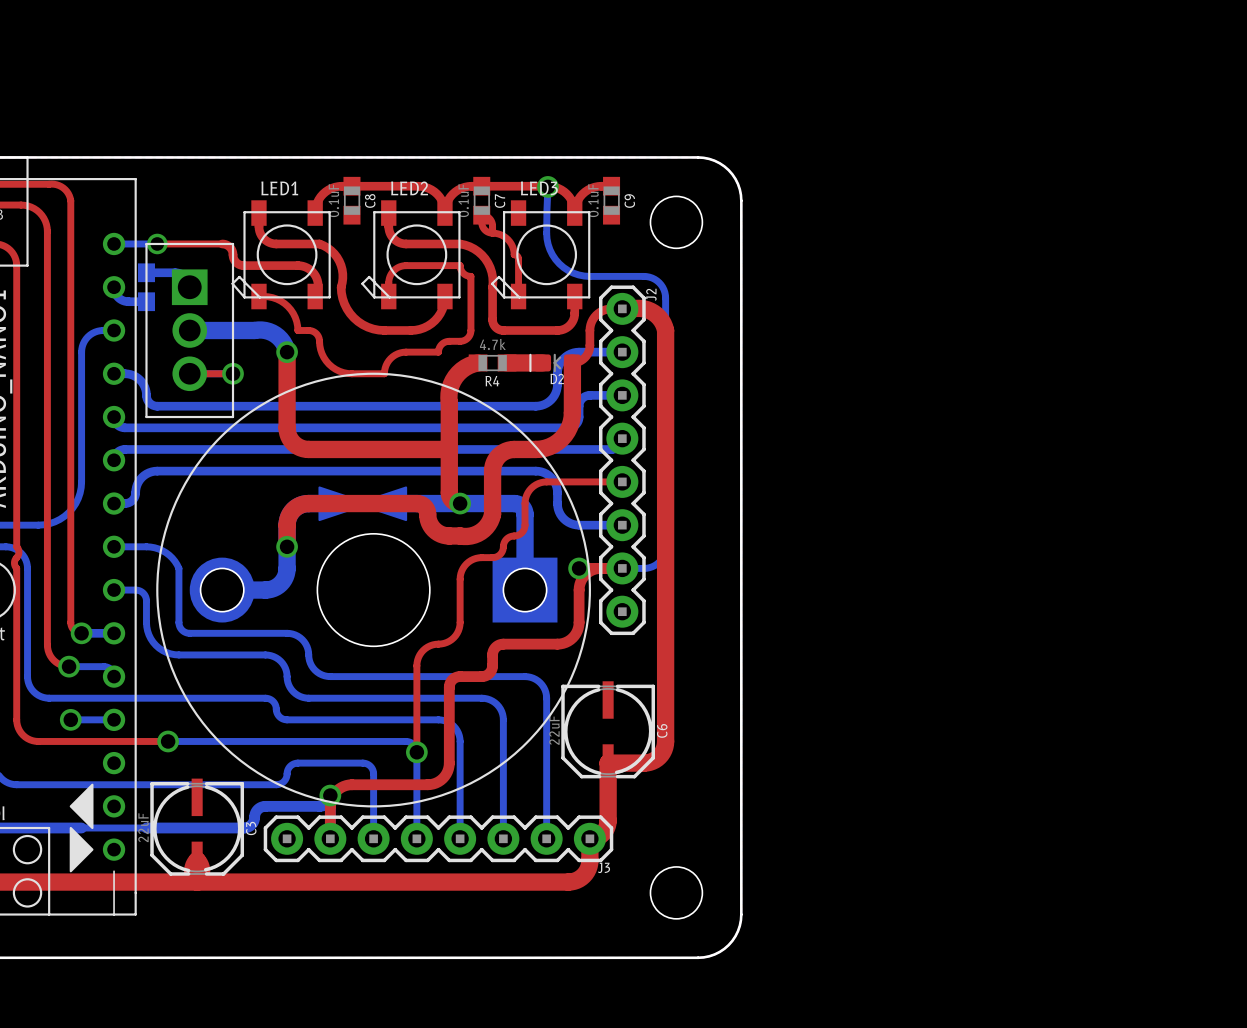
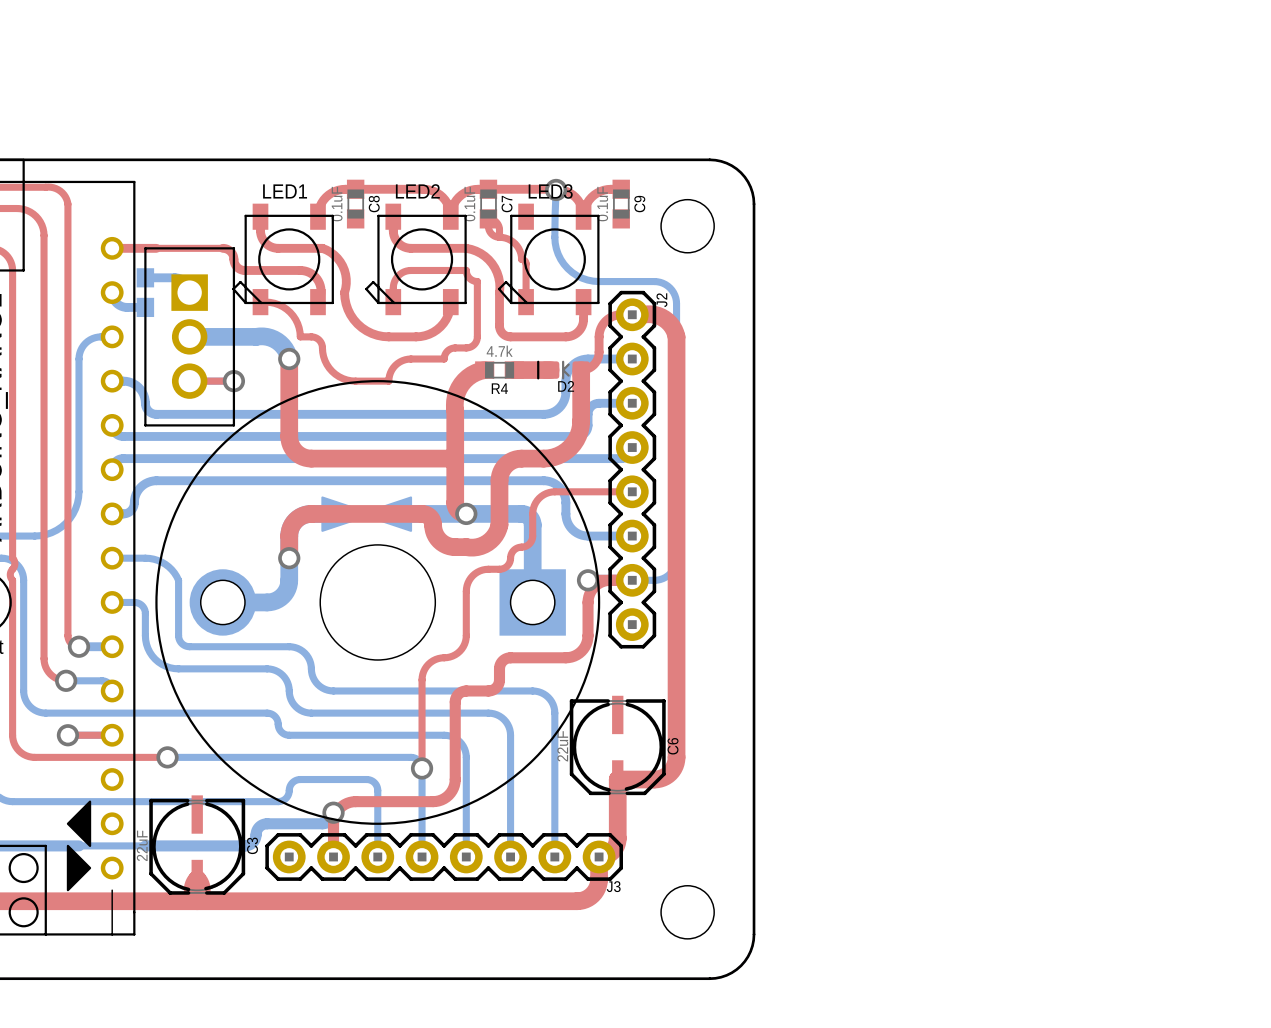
bottom track: (114, 243) (157, 243) -> none
top track: none -> (112, 248) (156, 248)
via: (157, 243) -> none
top track: none -> (67, 735) (112, 735)

